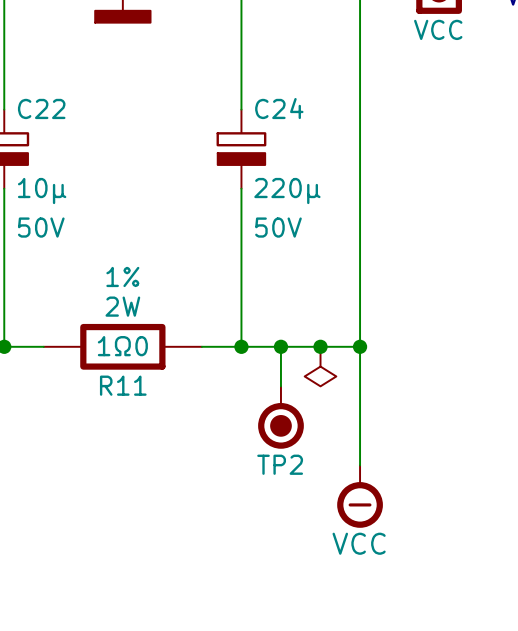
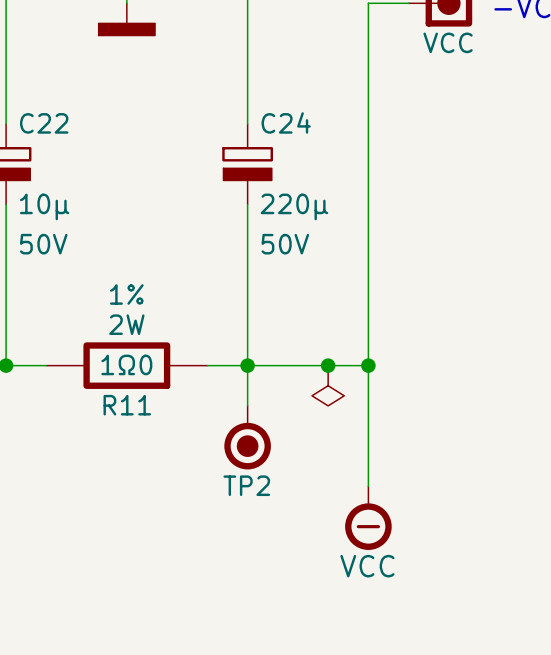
wire: (280, 346) (280, 386) -> (247, 365) (247, 405)
junction: (280, 346) -> none
TP2 position: (280, 417) -> (247, 437)

